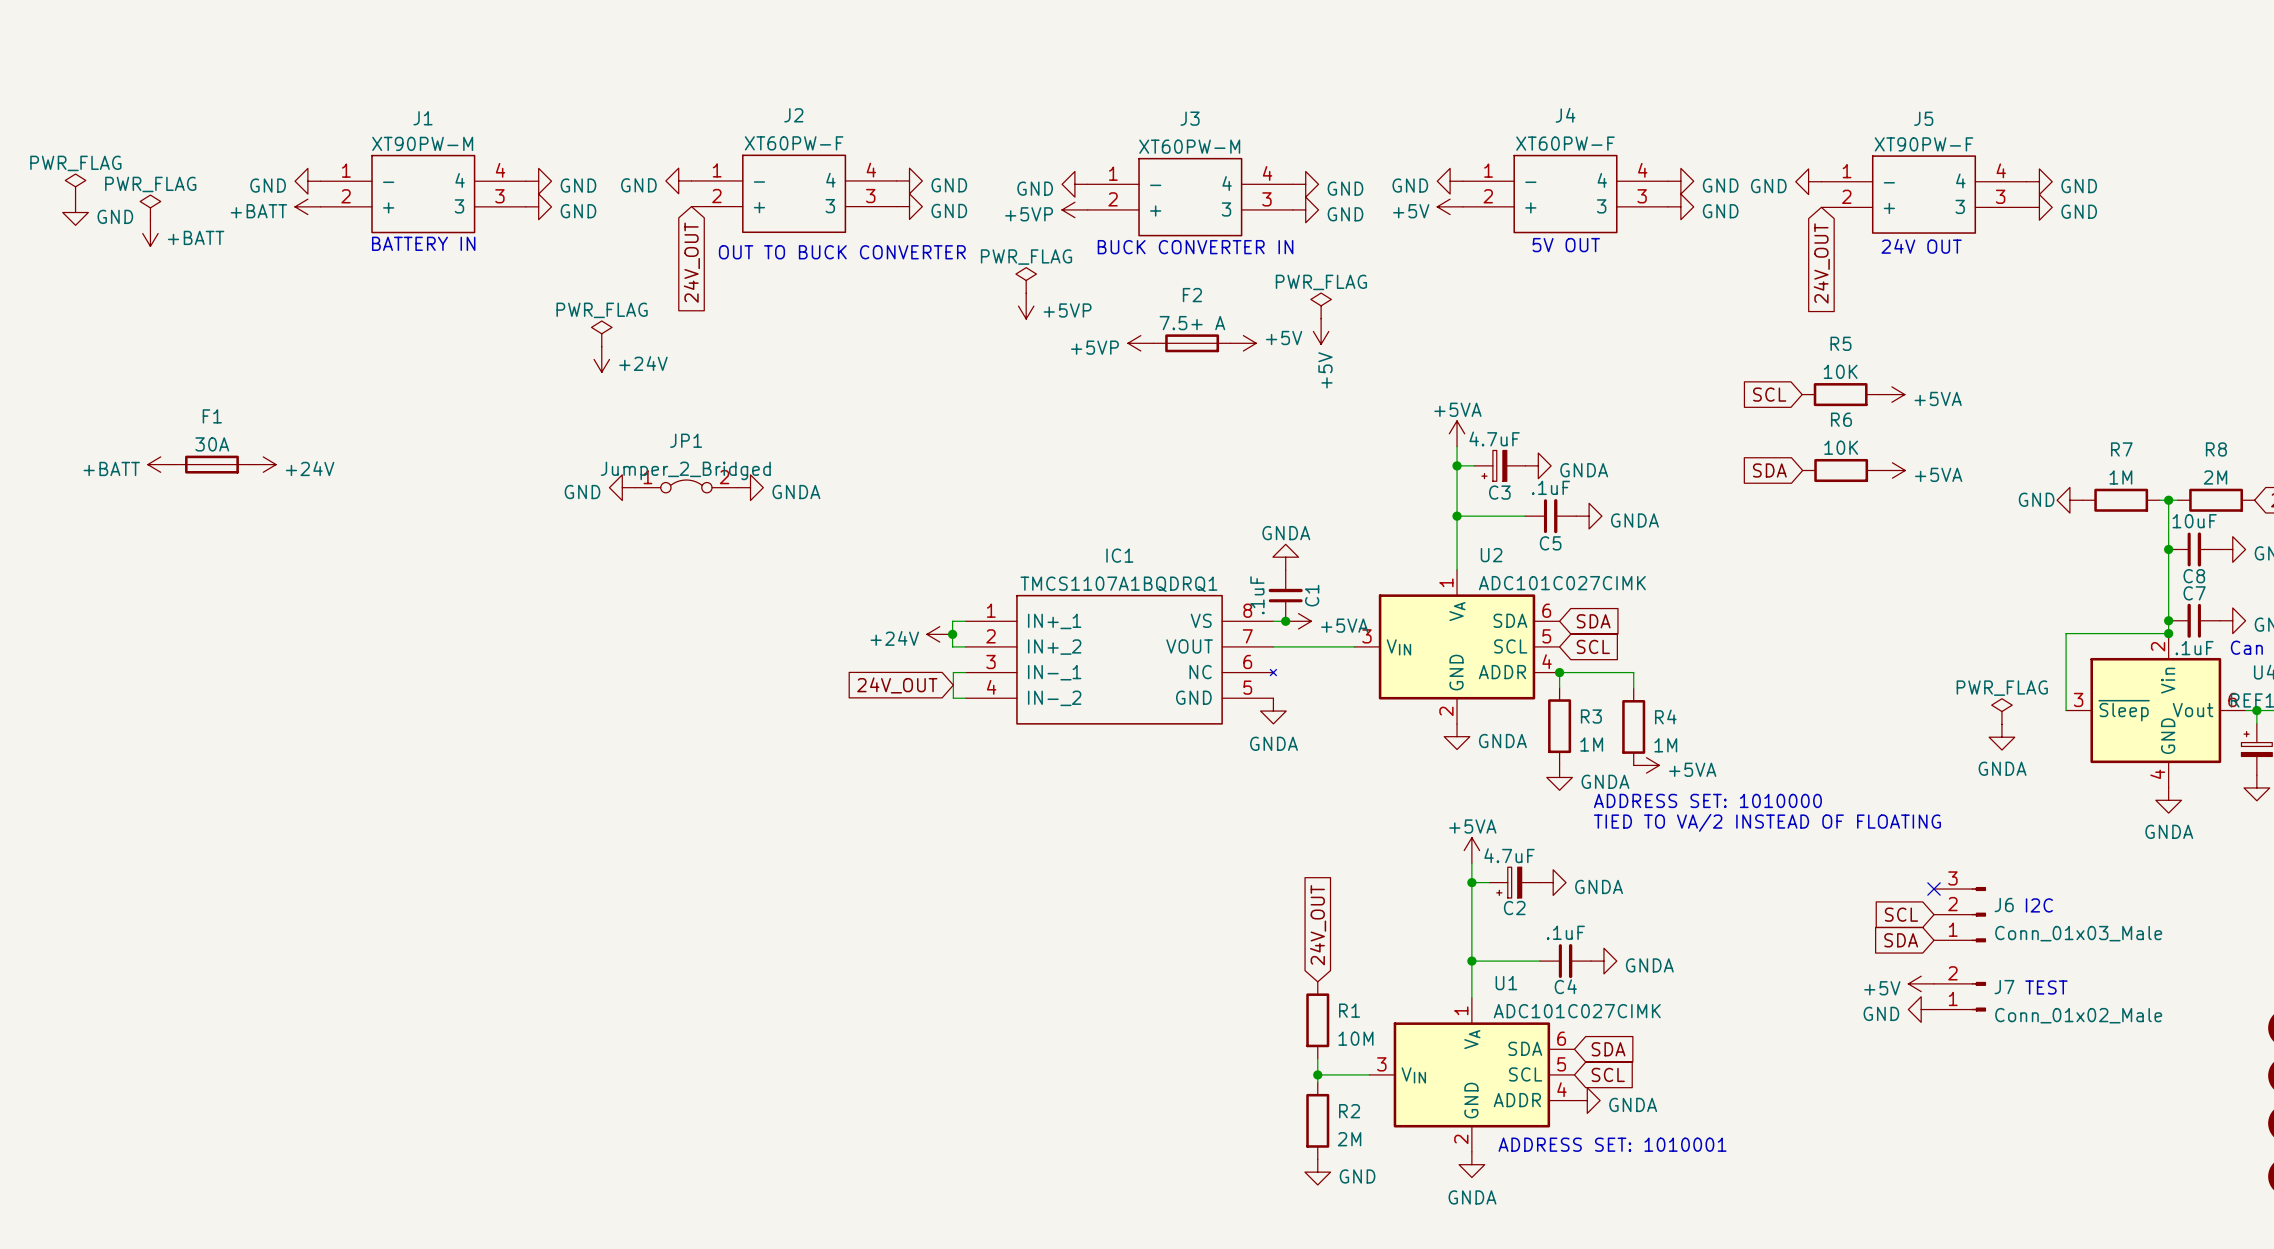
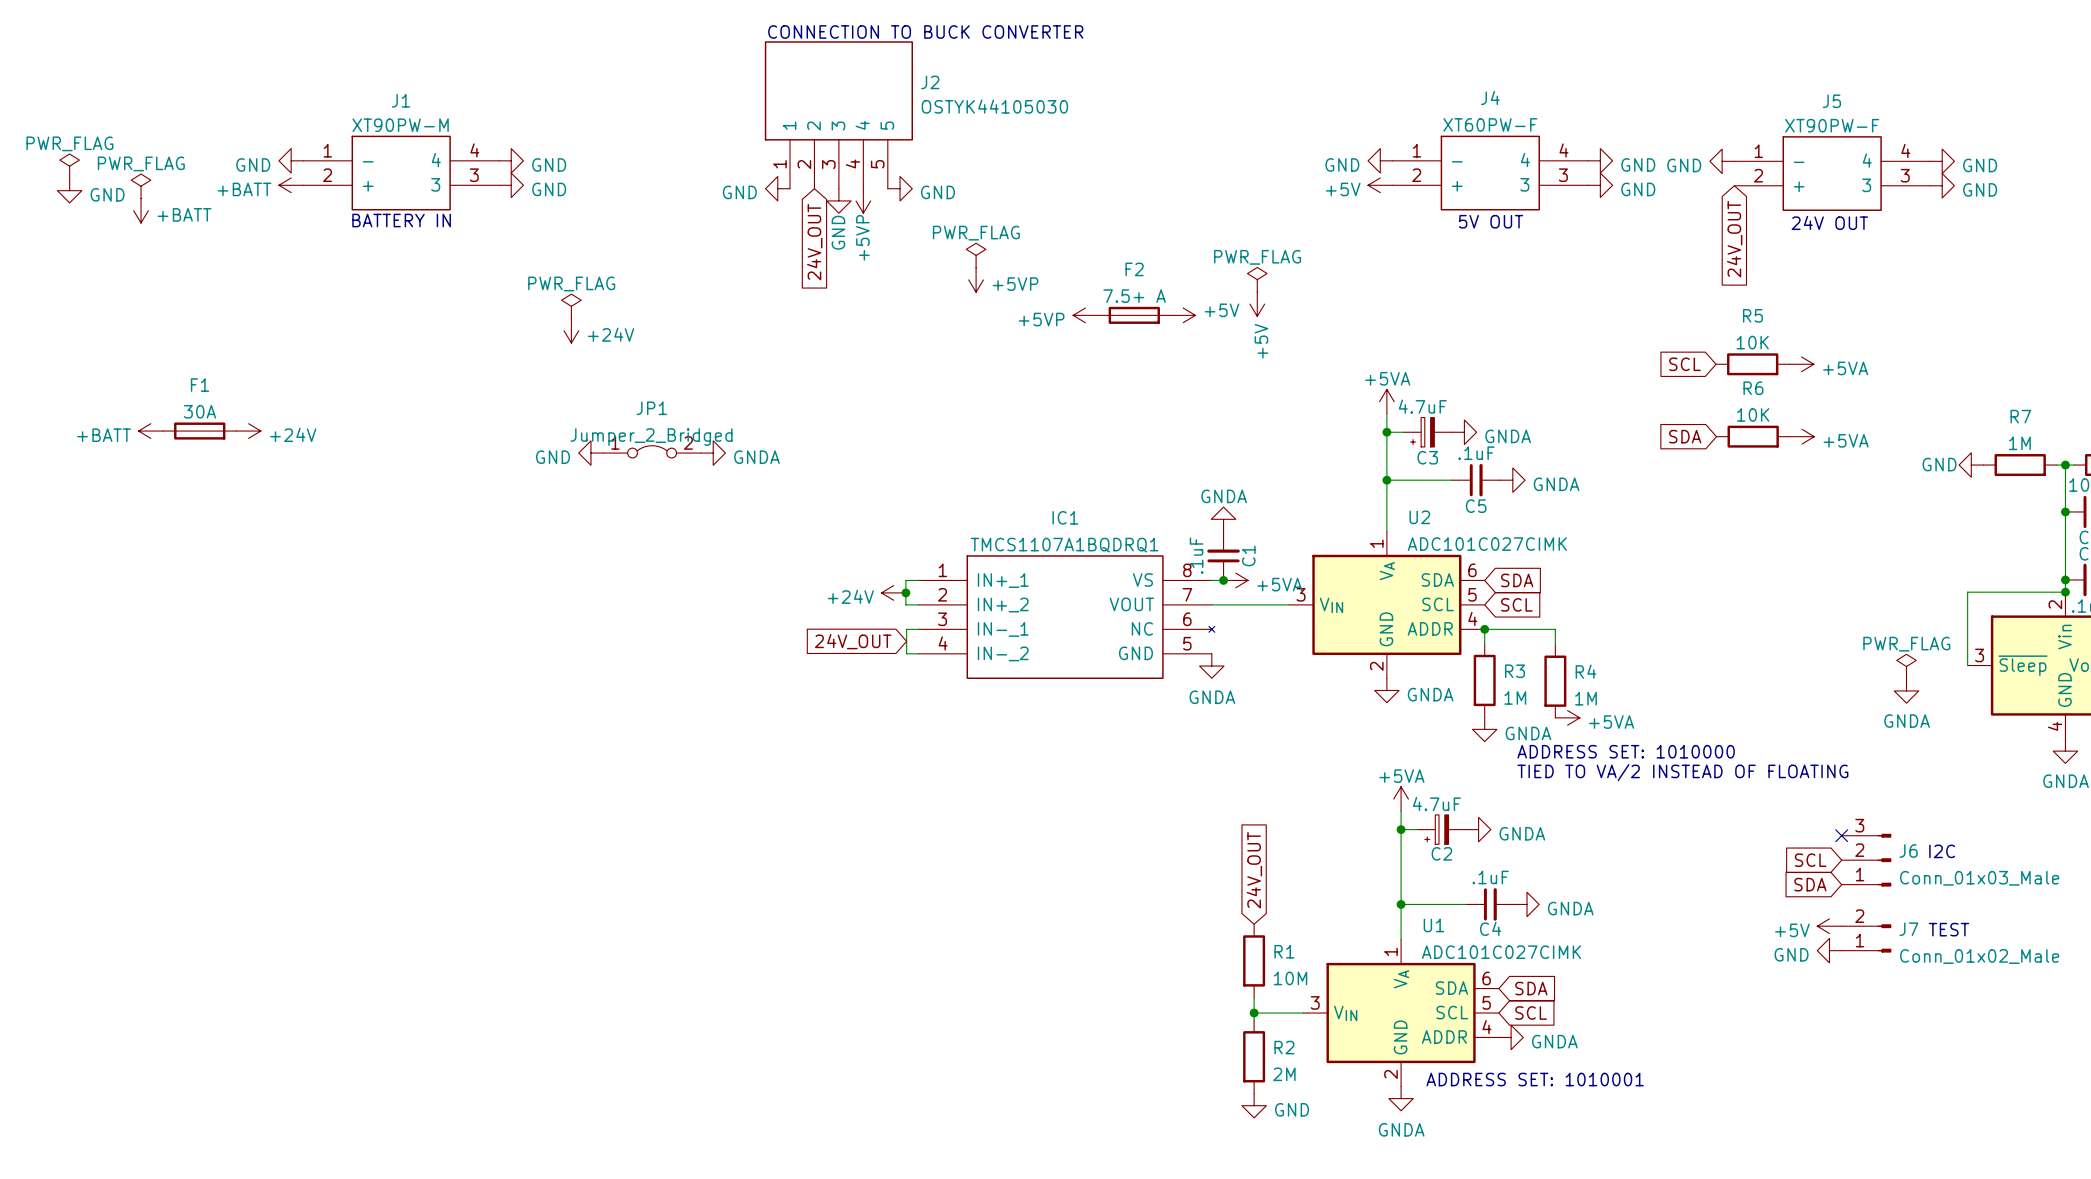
text: none -> CONNECTION TO BUCK CONVERTER (925, 31)
J2 name position: J2 (793, 115) -> J2 (930, 82)
J2 value: XT60PW-F (794, 143) -> OSTYK44105030 (994, 106)
J2 symbol: [691, 154, 897, 234] -> [764, 41, 914, 189]
power symbol: GND (678, 180) -> none
power symbol: GND (909, 180) -> none
power symbol: GND (1074, 184) -> none
power symbol: GND (1305, 184) -> none
J3: XT60PW-M (1190, 197) -> none
power symbol: GND (909, 206) -> none
power symbol rotation: 0° (1074, 209) -> 90° counterclockwise (863, 200)
power symbol position: +5VP (1074, 209) -> +5VP (863, 200)
power symbol: GND (1305, 209) -> none
power symbol: none -> GND (777, 188)
power symbol: none -> GND (900, 188)
power symbol: none -> GND (838, 200)
text: BUCK CONVERTER IN (1195, 247) -> none
text: OUT TO BUCK CONVERTER (842, 252) -> none
global label position: 24V_OUT (691, 262) -> 24V_OUT (814, 242)

